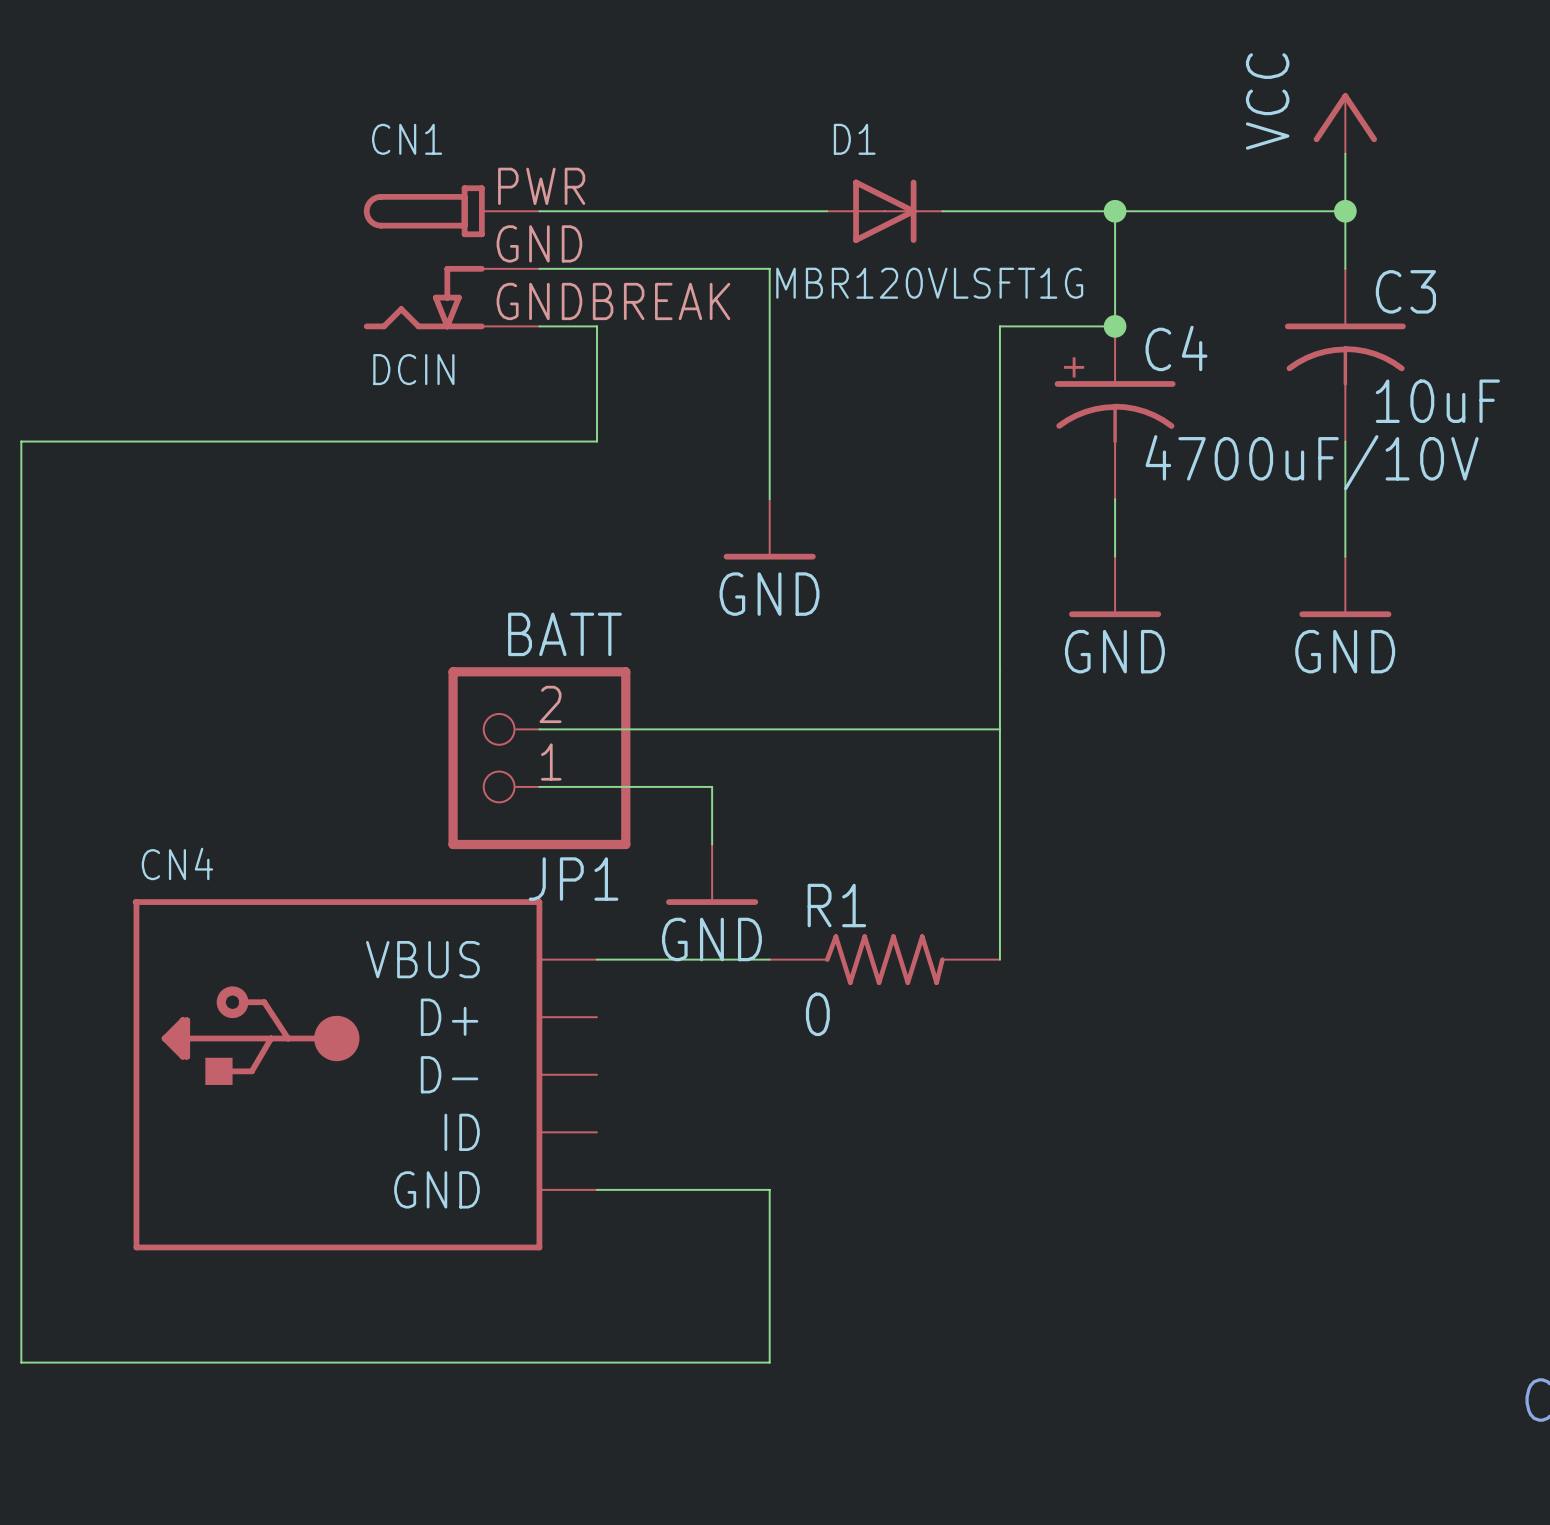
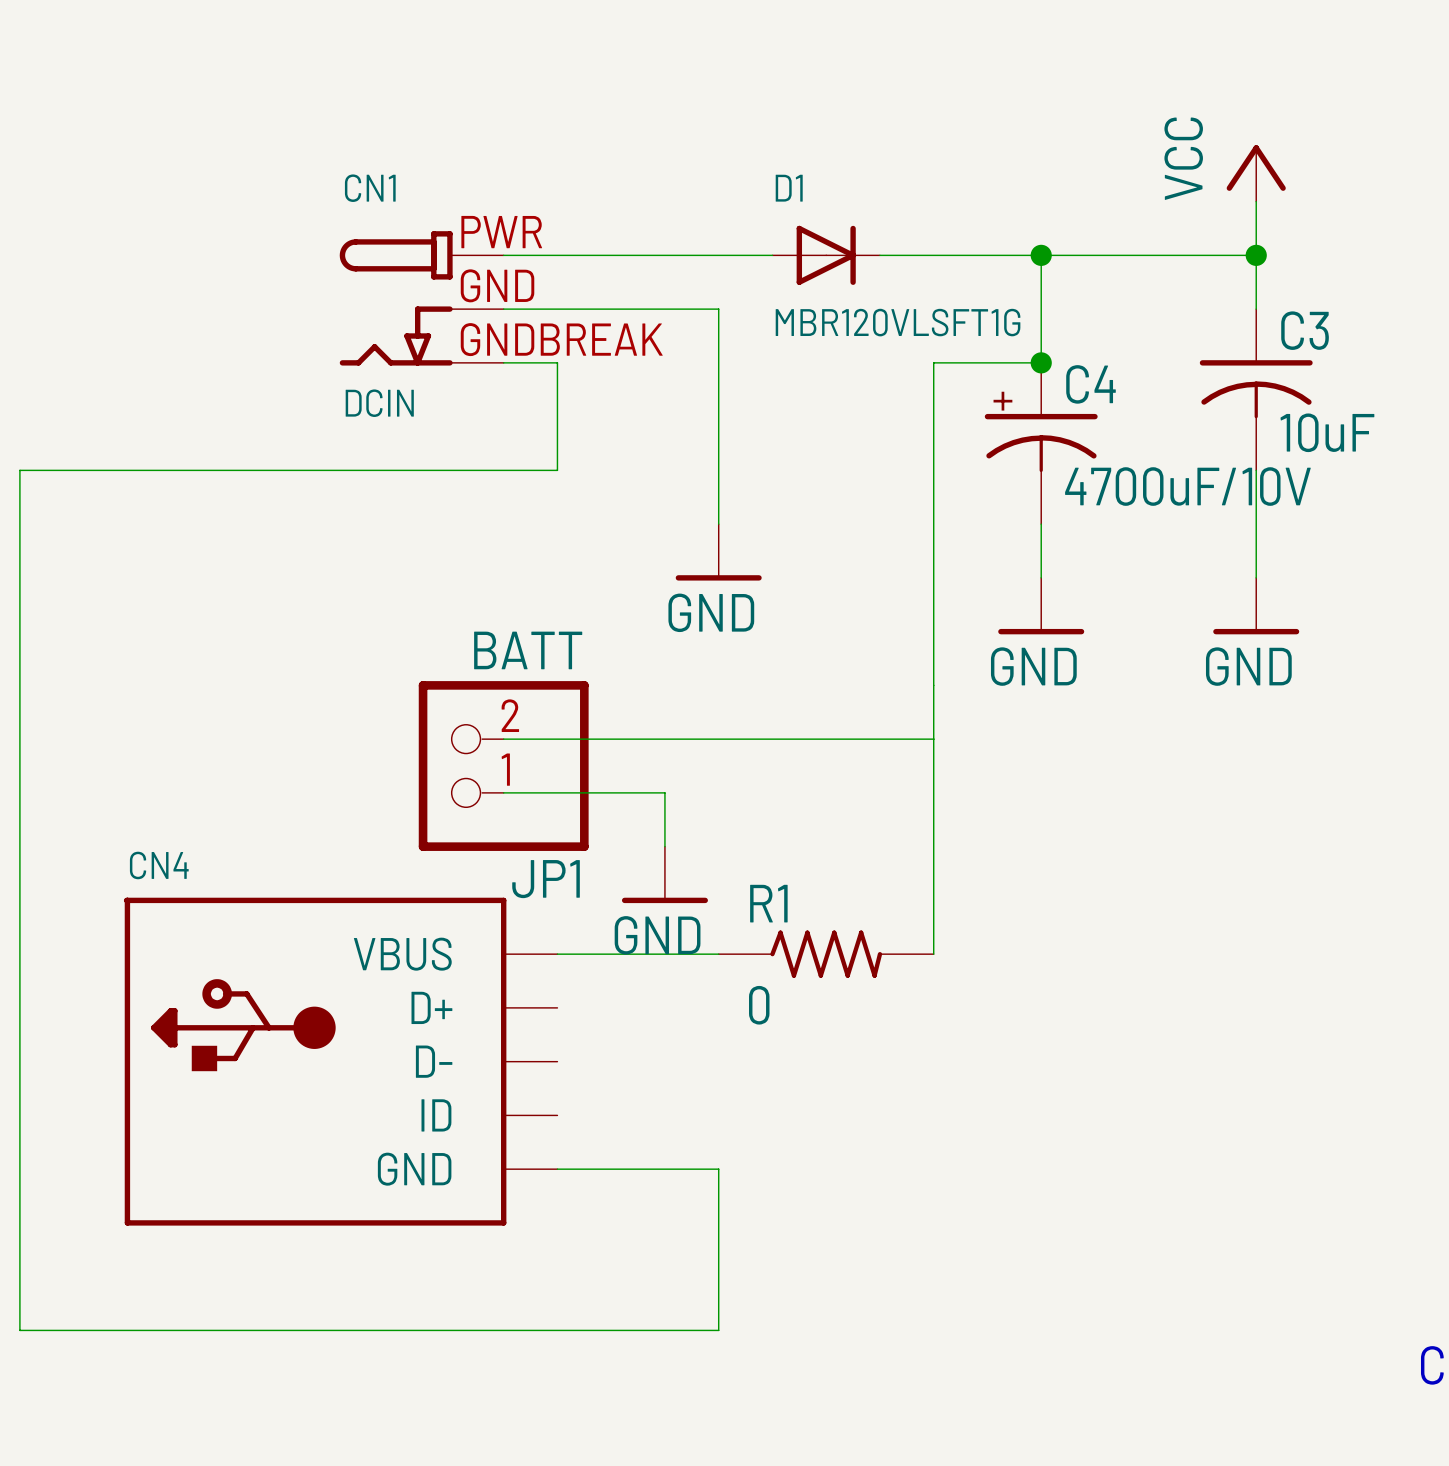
D1 value position: MBR120VLSFT1G (929, 283) -> MBR120VLSFT1G (898, 322)

